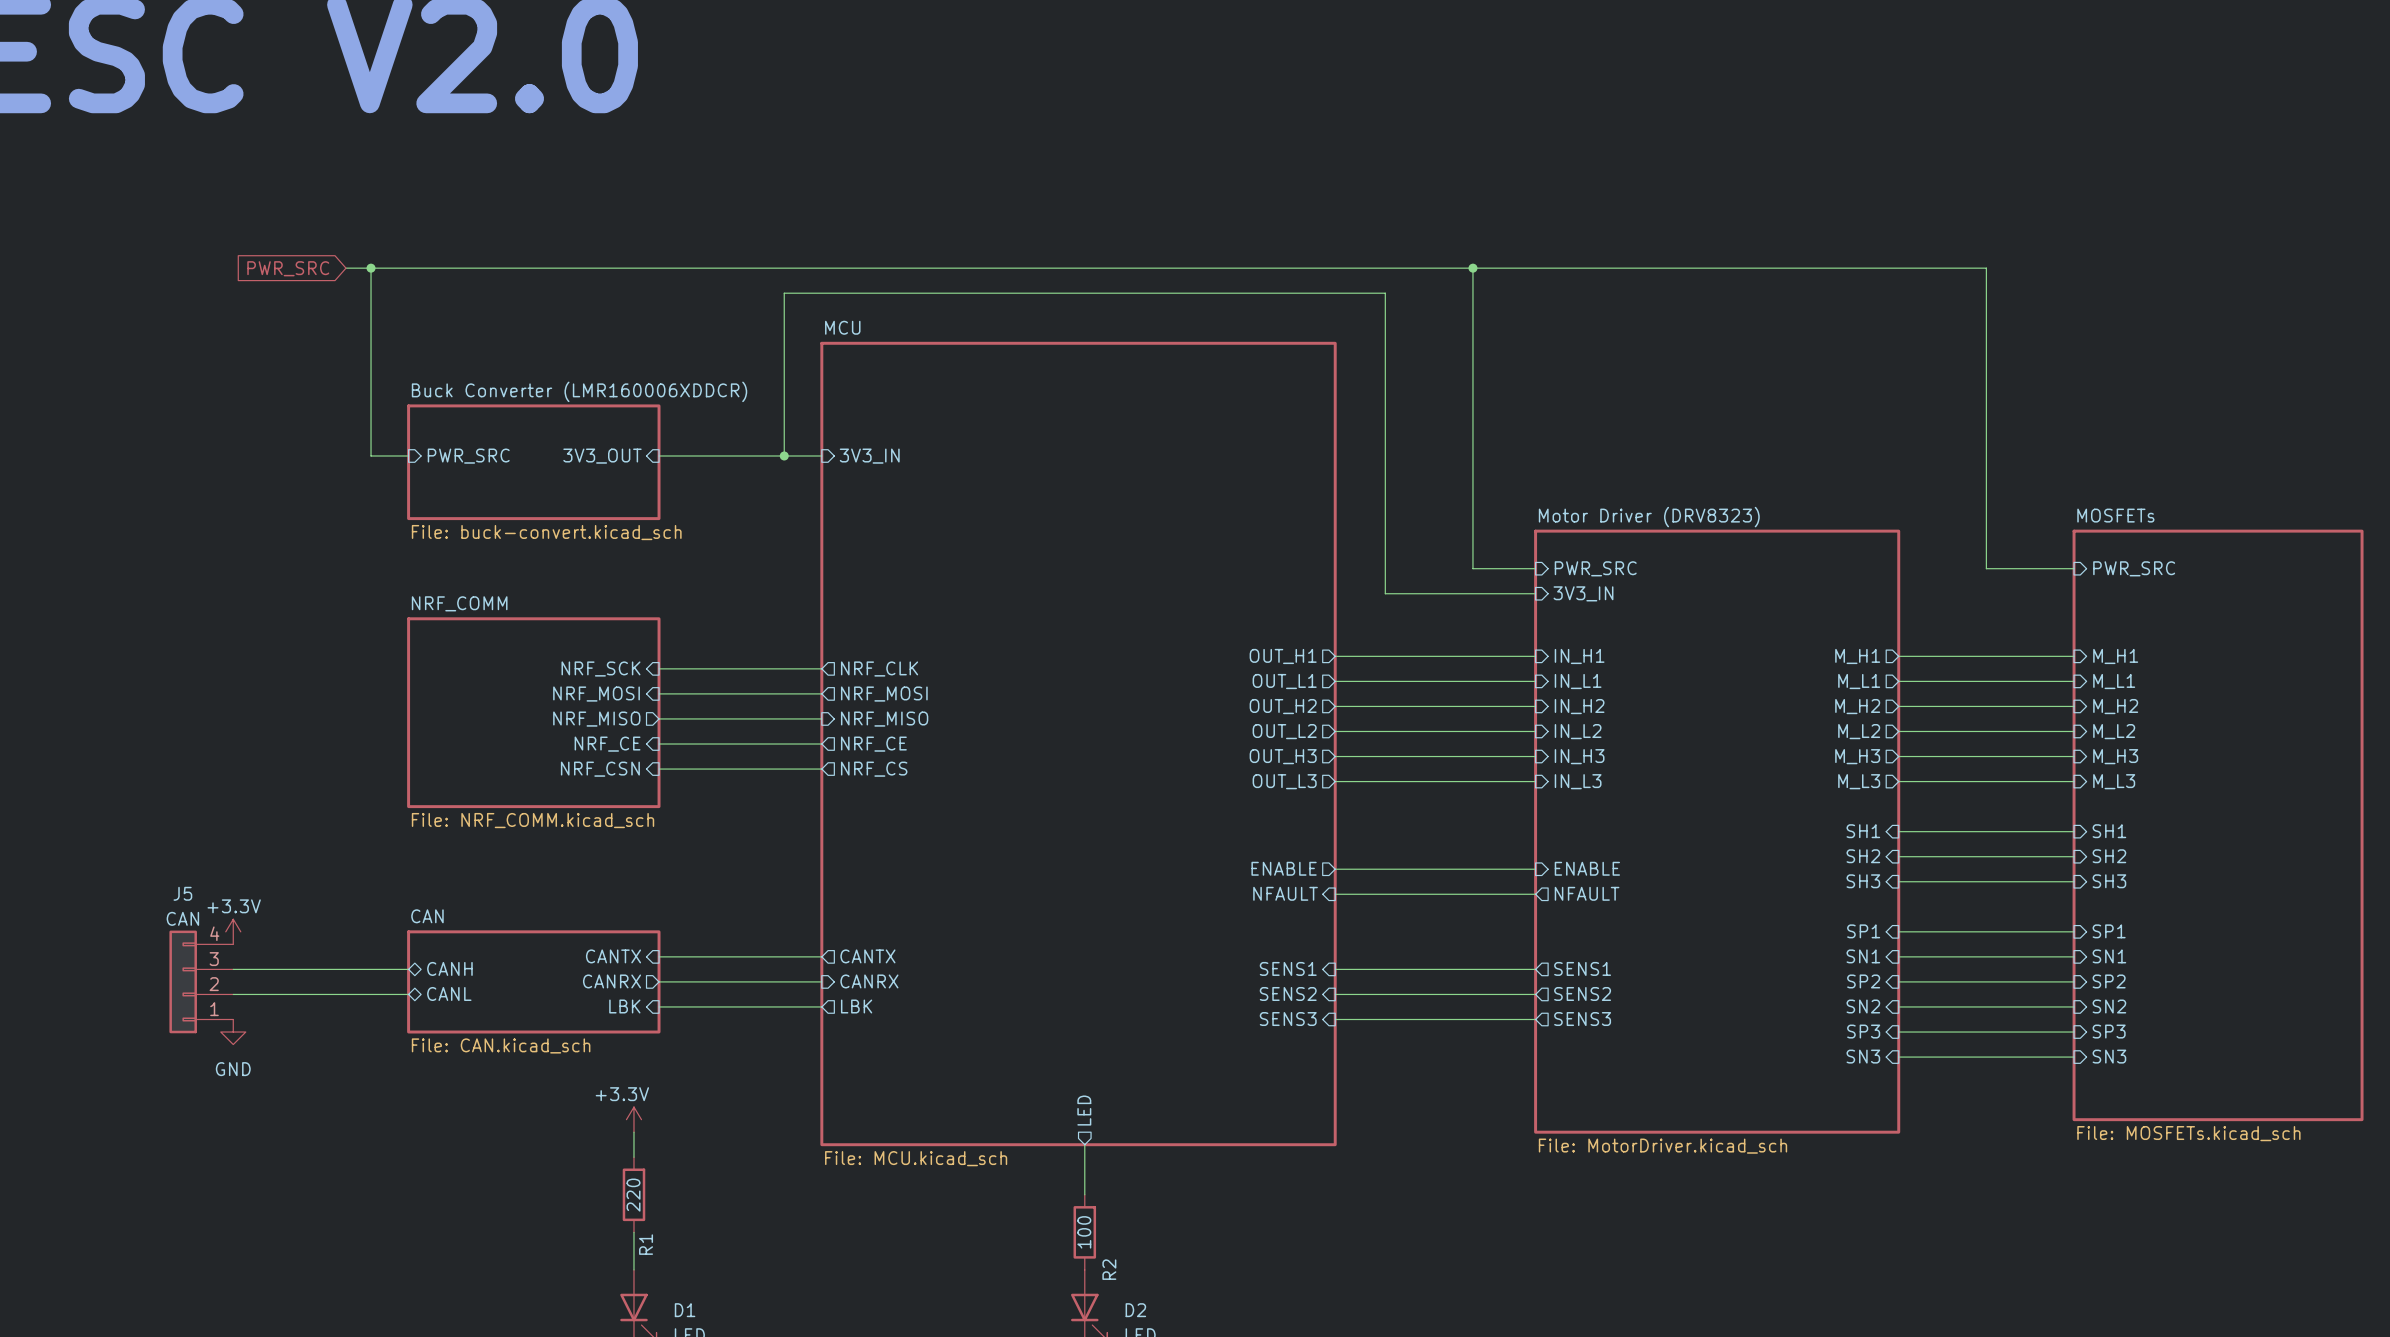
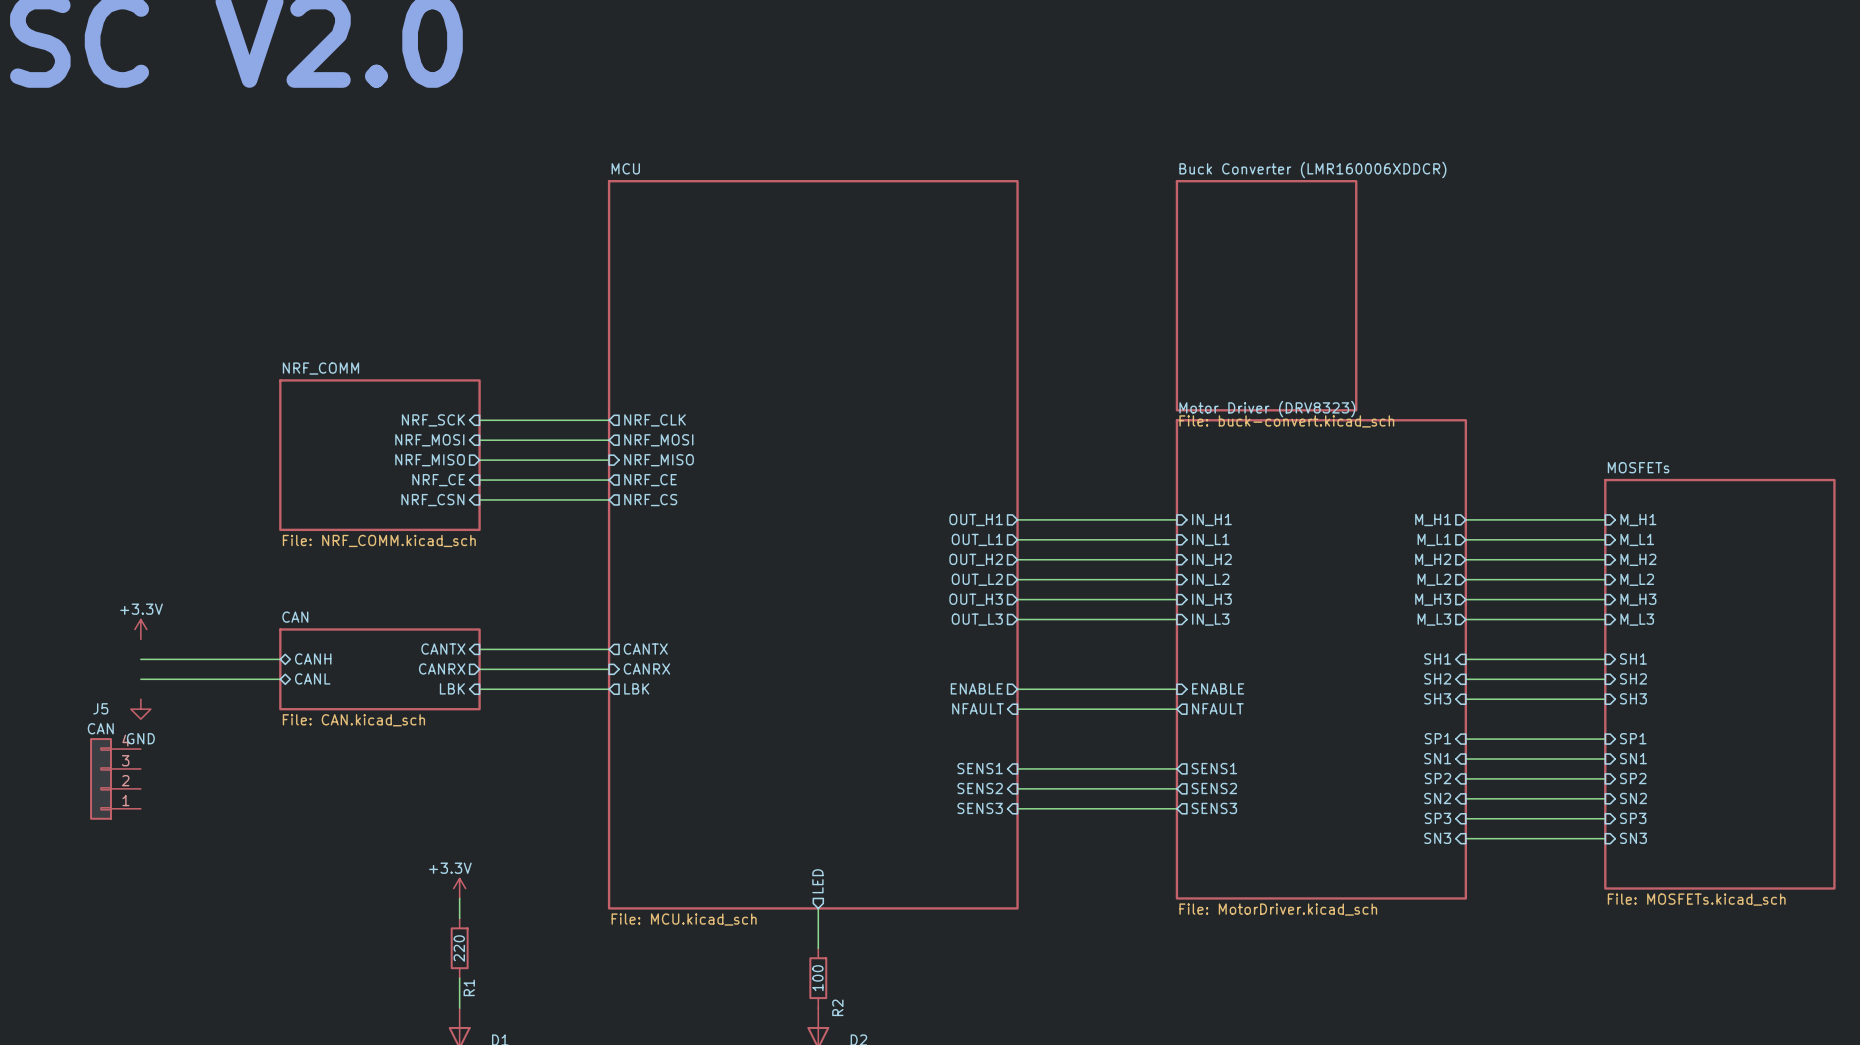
global label: PWR_SRC (288, 268) -> none
wire: (345, 268) (1986, 268) (1986, 568) (2074, 568) -> none
wire: (371, 268) (371, 455) (408, 455) -> none
junction: (371, 268) -> none
wire: (1472, 268) (1472, 568) (1535, 568) -> none
junction: (1472, 268) -> none
sheet Buck Converter (LMR160006XDDCR) name position: Buck Converter (LMR160006XDDCR) (579, 391) -> Buck Converter (LMR160006XDDCR) (1312, 170)
sheet Buck Converter (LMR160006XDDCR) shape: [407, 404, 661, 521] -> [1175, 180, 1358, 412]
wire: (659, 455) (821, 455) -> none
wire: (784, 455) (784, 293) (1385, 293) (1385, 593) (1535, 593) -> none
junction: (784, 455) -> none
sheet pin: PWR_SRC (468, 456) -> none
sheet pin: 3V3_OUT (602, 456) -> none
sheet pin: 3V3_IN (869, 456) -> none
sheet Buck Converter (LMR160006XDDCR) value position: File: buck-convert.kicad_sch (546, 532) -> File: buck-convert.kicad_sch (1286, 421)
sheet pin: none -> NRF_MOSI (429, 440)
sheet pin: none -> NRF_MOSI (658, 440)
sheet pin: PWR_SRC (1595, 568) -> none
sheet pin: PWR_SRC (2134, 568) -> none
sheet pin: none -> NRF_MISO (430, 460)
sheet pin: none -> NRF_MISO (659, 460)
sheet pin: 3V3_IN (1583, 593) -> none
sheet pin: none -> NRF_CE (438, 480)
sheet pin: none -> NRF_CE (650, 480)
wire: (659, 668) (821, 668) -> (479, 420) (609, 420)
sheet pin position: NRF_SCK (600, 669) -> NRF_SCK (433, 420)
sheet pin position: NRF_CLK (879, 669) -> NRF_CLK (655, 420)
sheet MCU: none -> File: MCU.kicad_sch (813, 544)
wire: (659, 693) (821, 693) -> (479, 440) (609, 440)
sheet pin: NRF_MOSI (596, 694) -> none
sheet pin: NRF_MOSI (884, 694) -> none
sheet NRF_COMM position: (533, 712) -> (379, 455)
wire: (659, 718) (821, 718) -> (479, 460) (609, 460)
sheet pin: NRF_MISO (596, 719) -> none
sheet pin: NRF_MISO (884, 719) -> none
sheet pin: NRF_CE (607, 744) -> none
wire: (659, 744) (821, 744) -> (479, 480) (609, 480)
sheet pin: NRF_CE (873, 744) -> none
sheet MCU: File: MCU.kicad_sch (1078, 744) -> none
sheet pin position: NRF_CSN (600, 769) -> NRF_CSN (432, 500)
wire: (659, 769) (821, 769) -> (479, 499) (609, 499)
sheet pin position: NRF_CS (874, 769) -> NRF_CS (650, 500)
sheet pin: none -> CANTX (443, 649)
sheet pin: none -> CANTX (645, 649)
sheet MOSFETs: File: MOSFETs.kicad_sch (2218, 825) -> none
sheet pin: none -> CANRX (442, 668)
sheet pin: none -> CANRX (646, 668)
sheet MOSFETs: none -> File: MOSFETs.kicad_sch (1719, 684)
sheet pin: none -> LBK (452, 688)
sheet pin: none -> LBK (636, 688)
power symbol position: +3.3V (233, 931) -> +3.3V (140, 629)
sheet pin: CANTX (613, 956) -> none
wire: (659, 956) (821, 956) -> (479, 649) (609, 649)
sheet pin: CANTX (867, 956) -> none
sheet pin position: CANH (449, 968) -> CANH (313, 659)
wire: (233, 969) (408, 969) -> (140, 659) (280, 659)
sheet CAN position: (533, 981) -> (379, 669)
sheet pin: CANRX (612, 981) -> none
wire: (659, 981) (821, 981) -> (479, 669) (609, 669)
sheet pin: CANRX (869, 981) -> none
sheet pin position: CANL (449, 993) -> CANL (312, 678)
wire: (233, 994) (408, 994) -> (140, 679) (280, 679)
sheet pin: LBK (624, 1006) -> none
wire: (659, 1006) (821, 1006) -> (479, 689) (609, 689)
sheet pin: LBK (856, 1006) -> none
power symbol position: GND (233, 1032) -> GND (140, 709)

